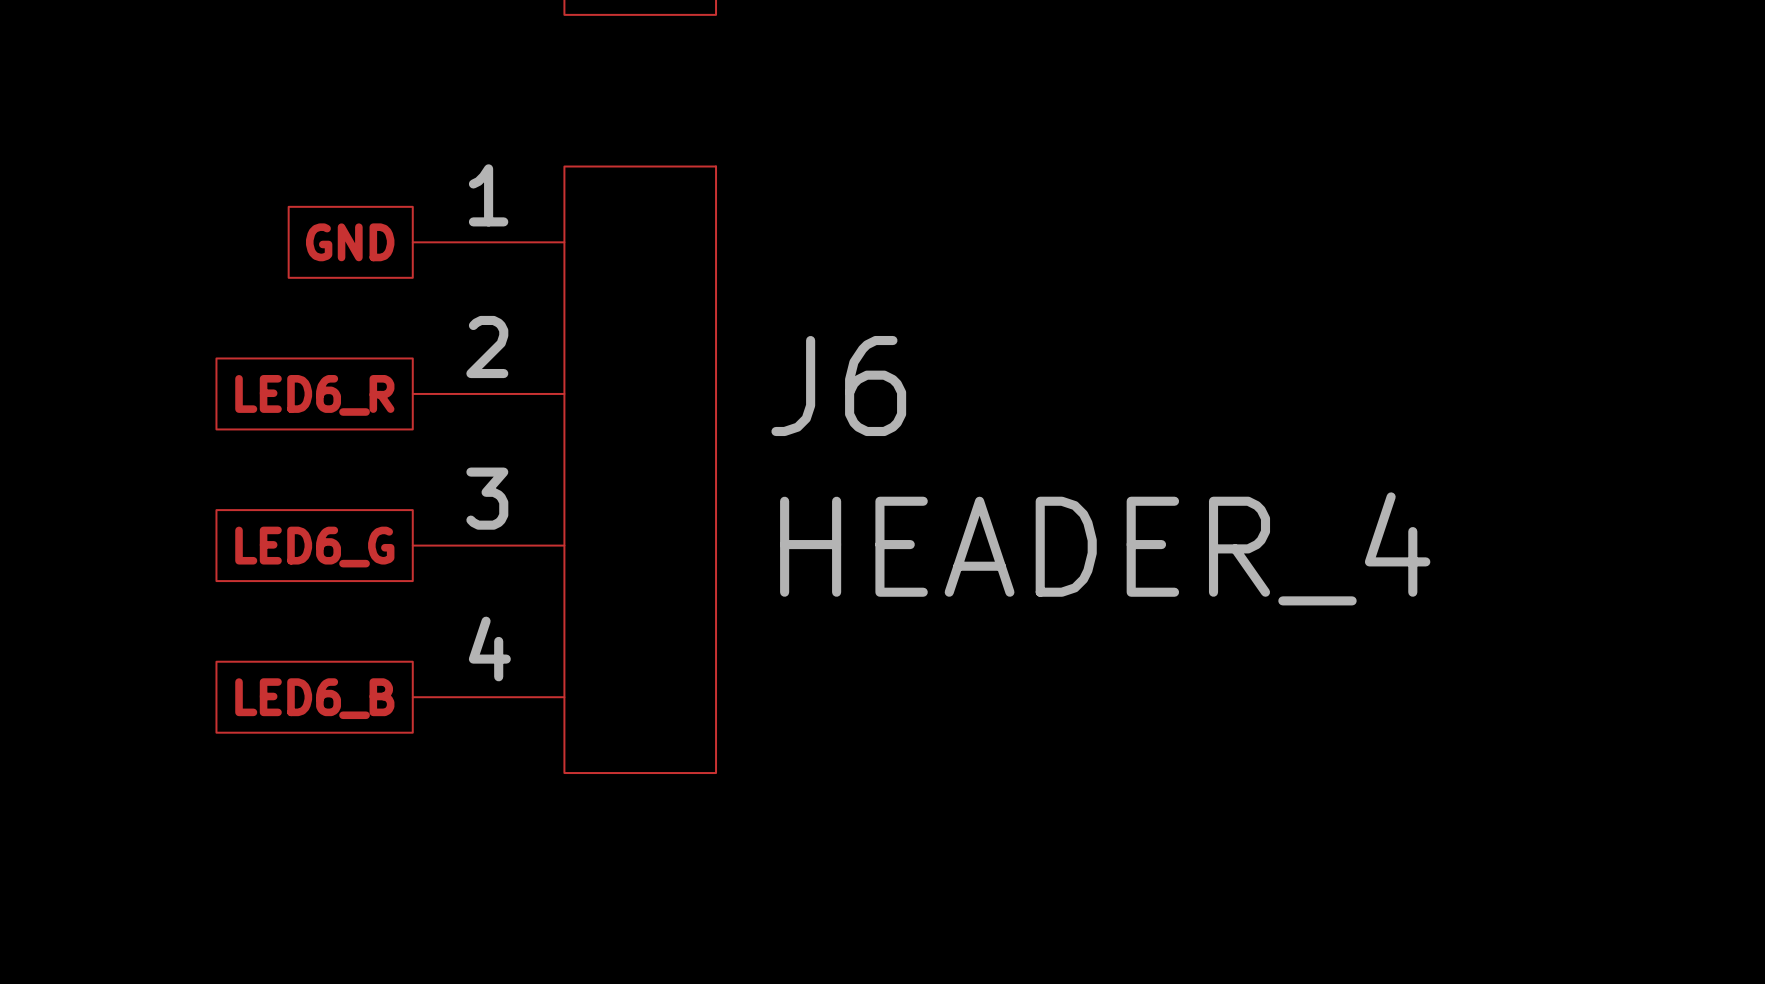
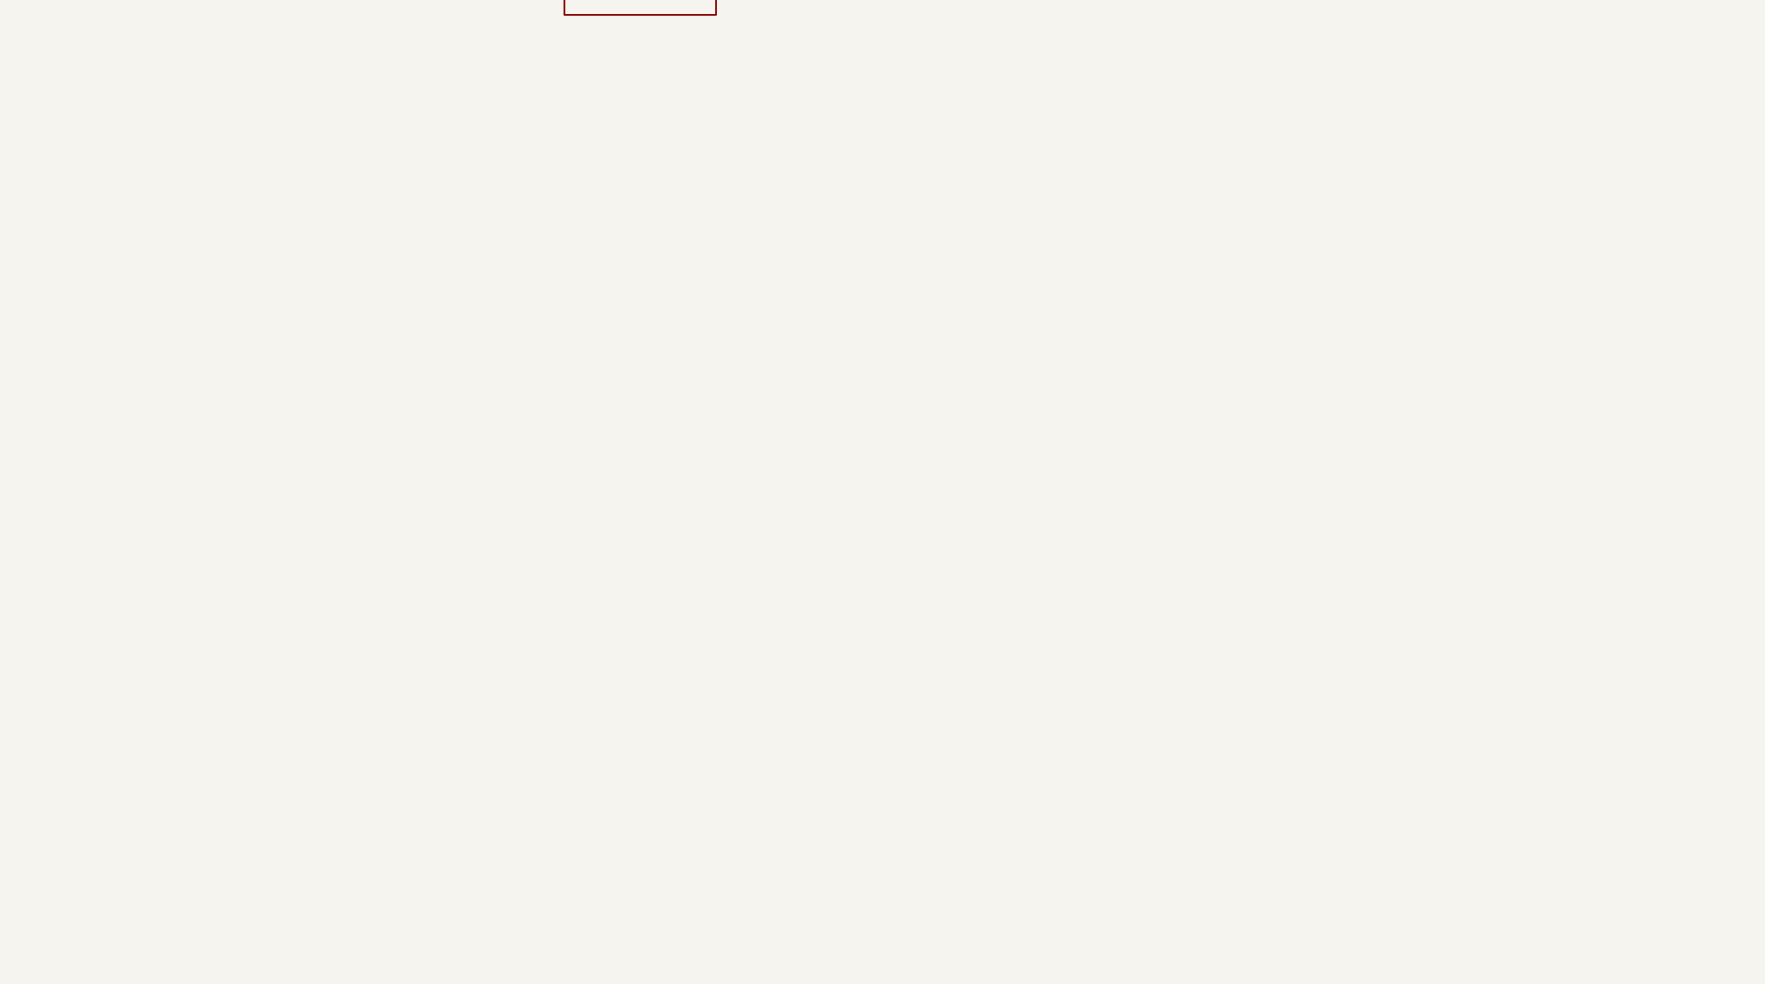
global label: GND (350, 242) -> none
global label: LED6_R (314, 395) -> none
J6: HEADER_4 (564, 469) -> none
global label: LED6_G (314, 547) -> none
global label: LED6_B (314, 698) -> none

